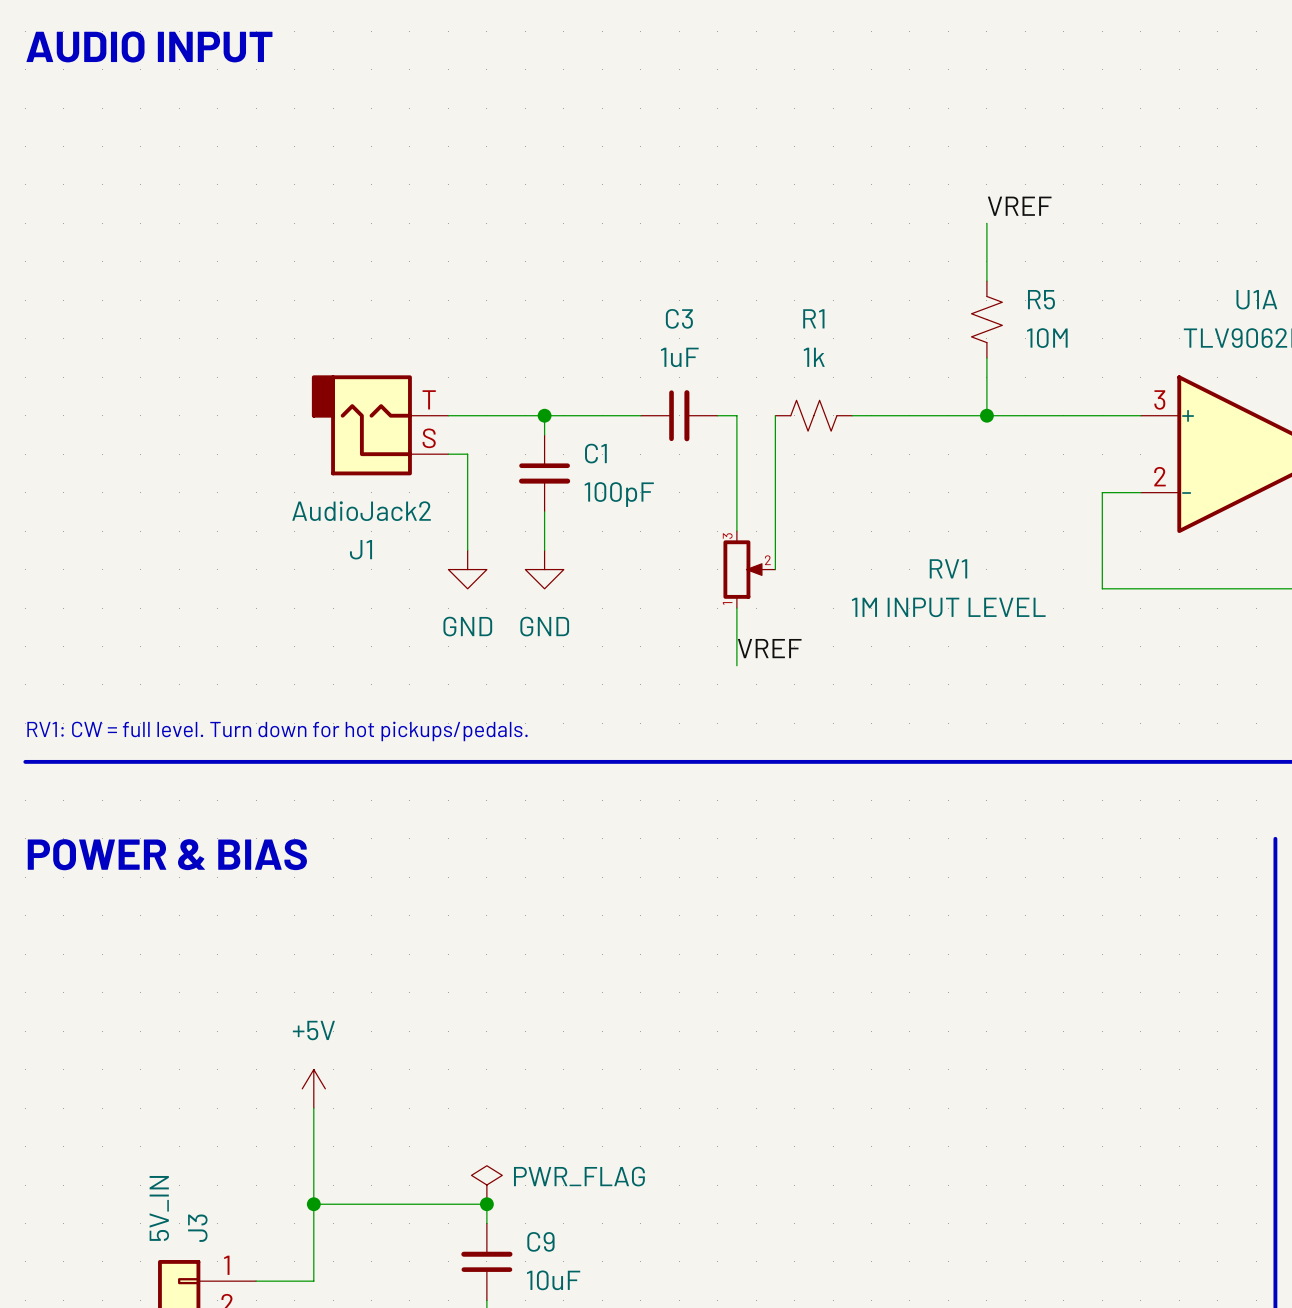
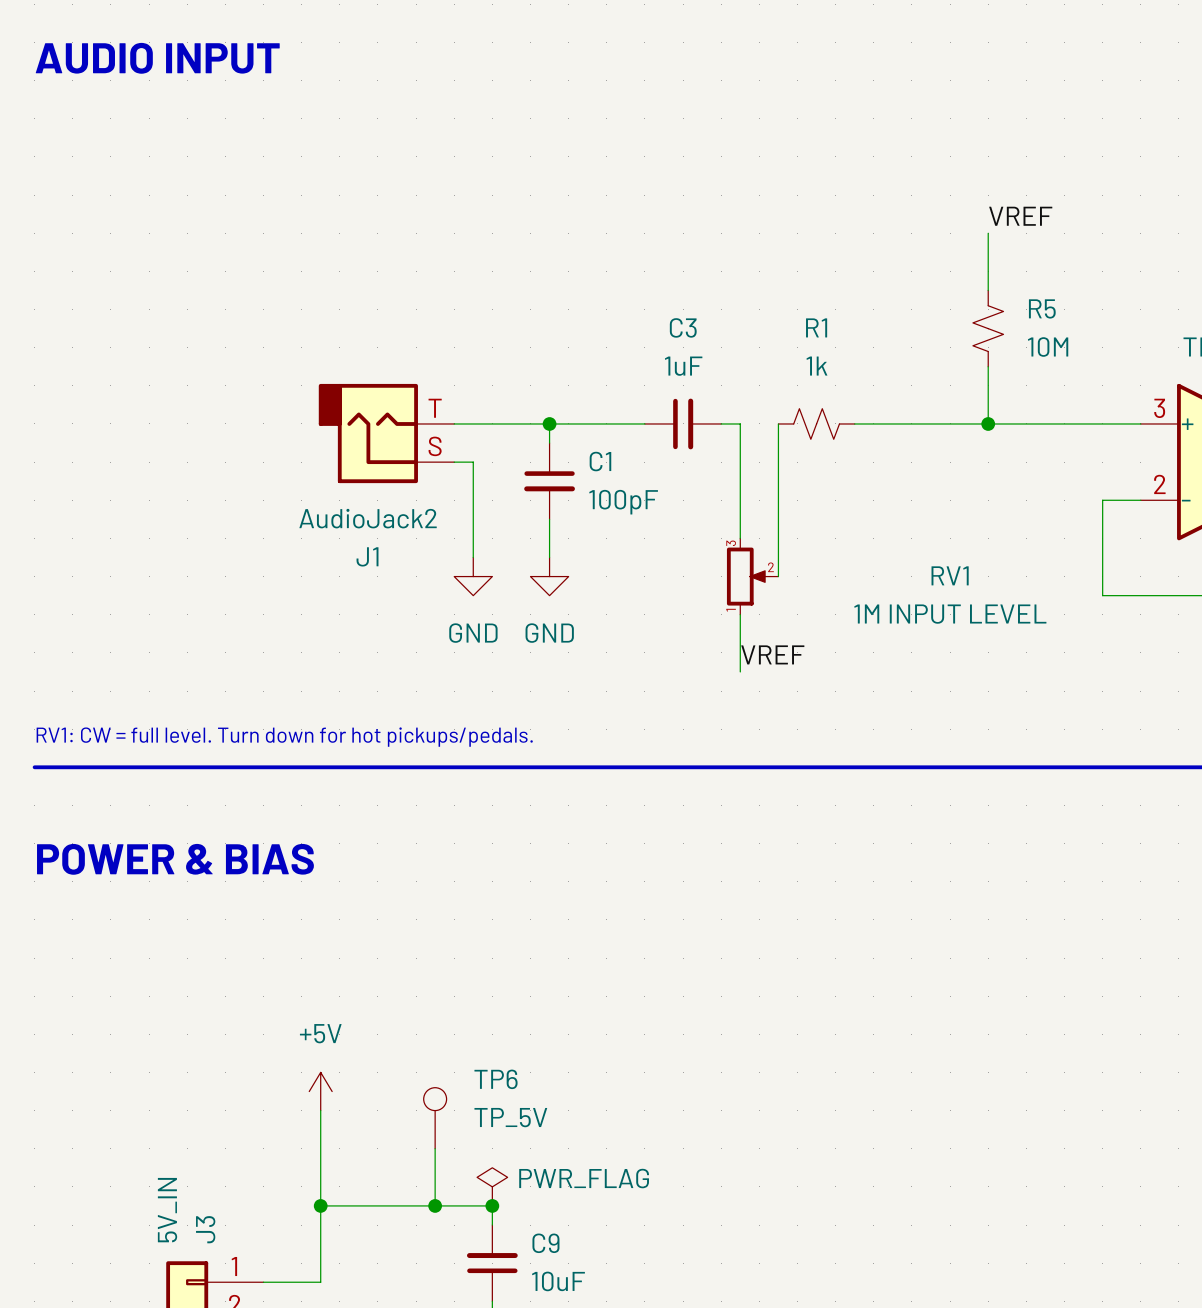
TP6: none -> TP_5V (435, 1118)
wire: none -> (435, 1148) (435, 1205)
junction: none -> (435, 1205)

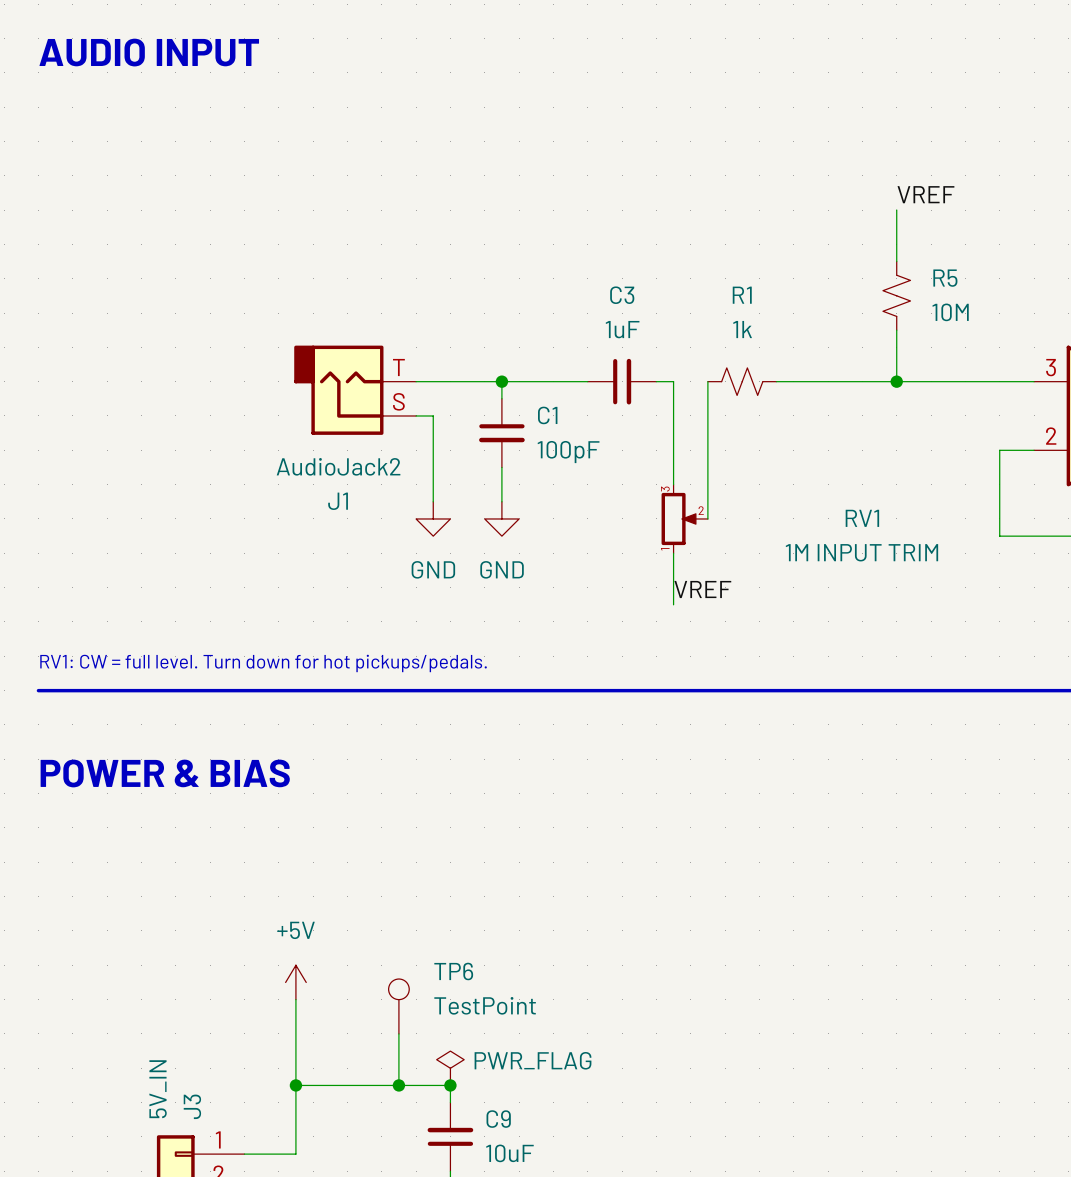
RV1 value: 1M INPUT LEVEL (950, 614) -> 1M INPUT TRIM (861, 552)
TP6 value: TP_5V (510, 1117) -> TestPoint (485, 1005)

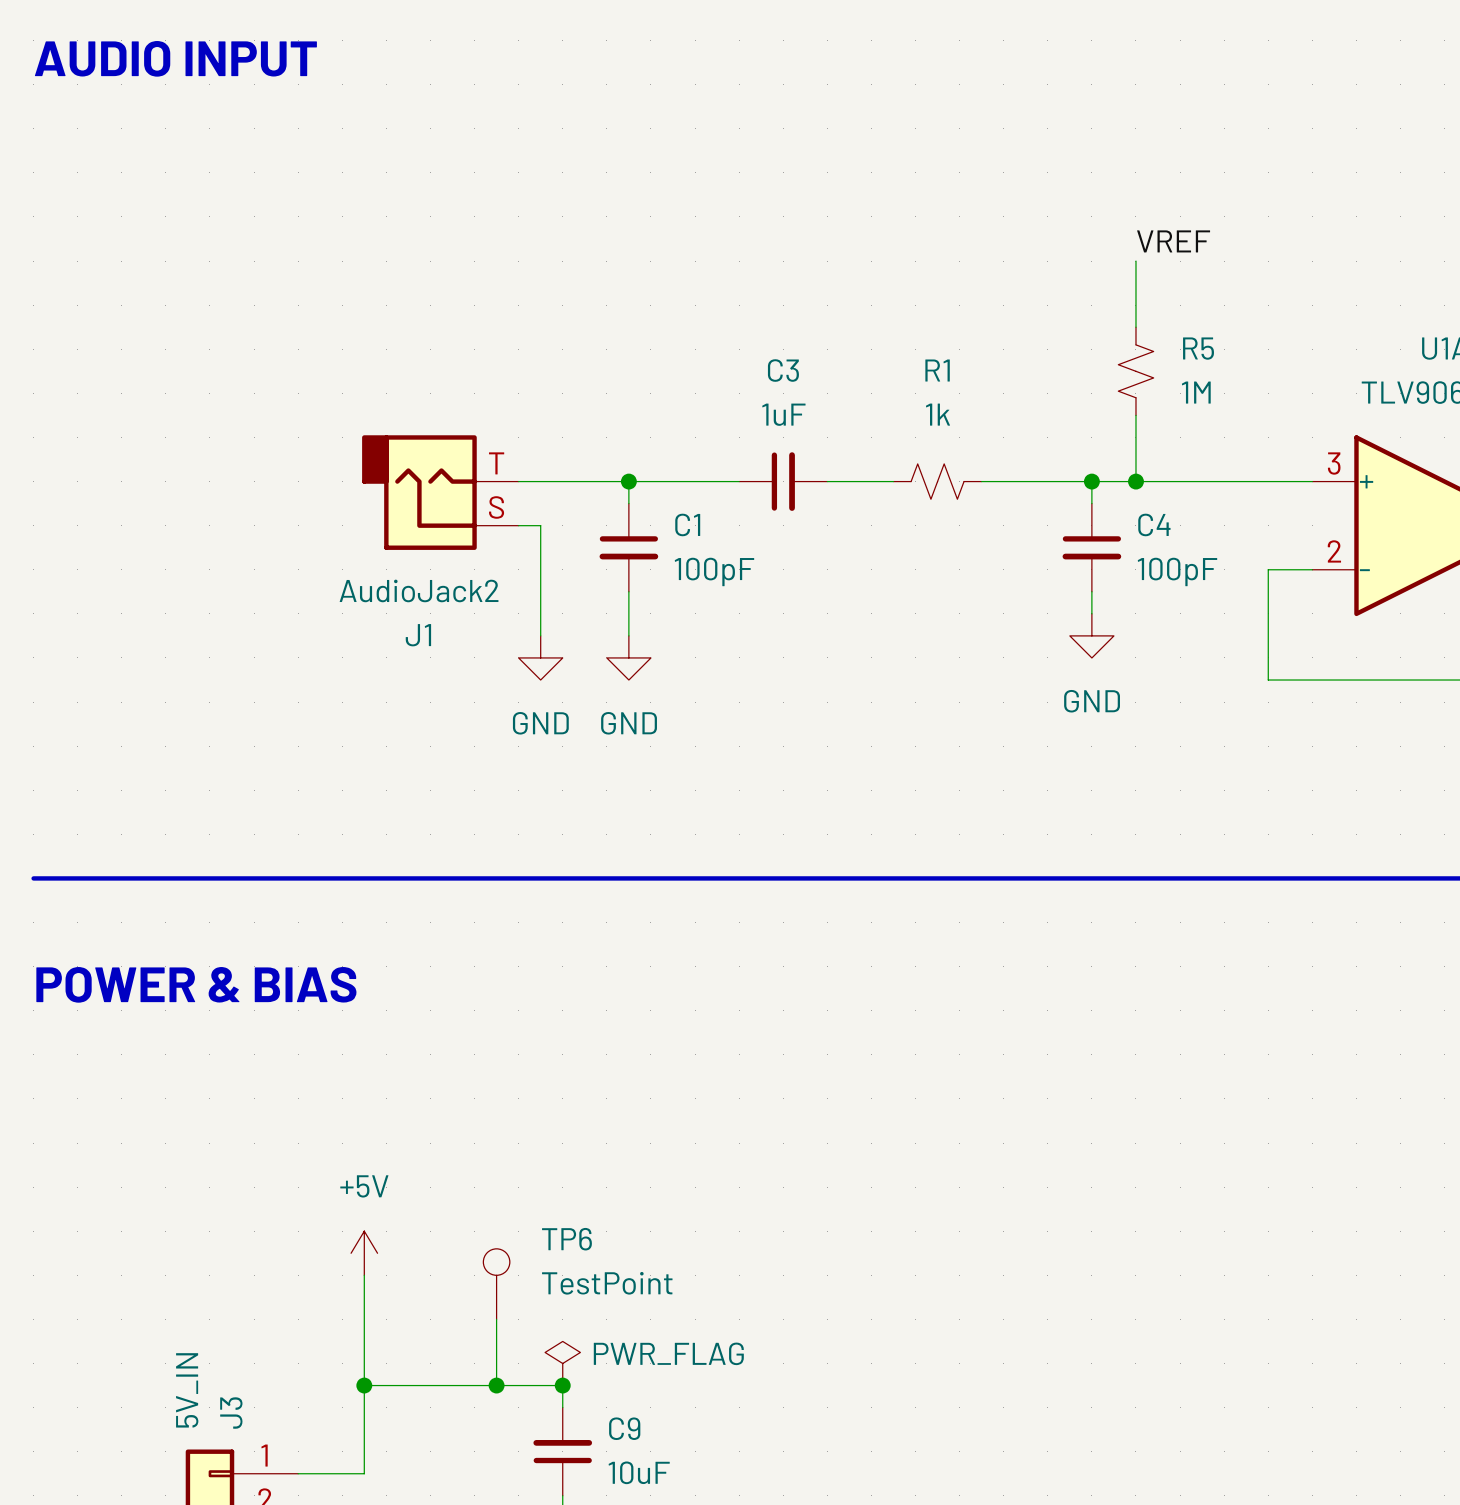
R5 value: 10M (950, 312) -> 1M (1196, 392)
wire: (673, 381) (673, 484) -> (849, 481) (893, 481)
wire: (707, 381) (707, 518) -> none
wire: none -> (1091, 481) (1091, 503)
junction: none -> (1091, 481)
C4: none -> 100pF (1091, 547)
wire: none -> (1091, 591) (1091, 613)
power symbol: none -> GND (1091, 635)
RV1: 1M INPUT TRIM (684, 518) -> none
wire: (673, 553) (673, 604) -> none
label: VREF (702, 589) -> none
text: RV1: CW = full level. Turn down for hot pickups/pedals. (263, 663) -> none

